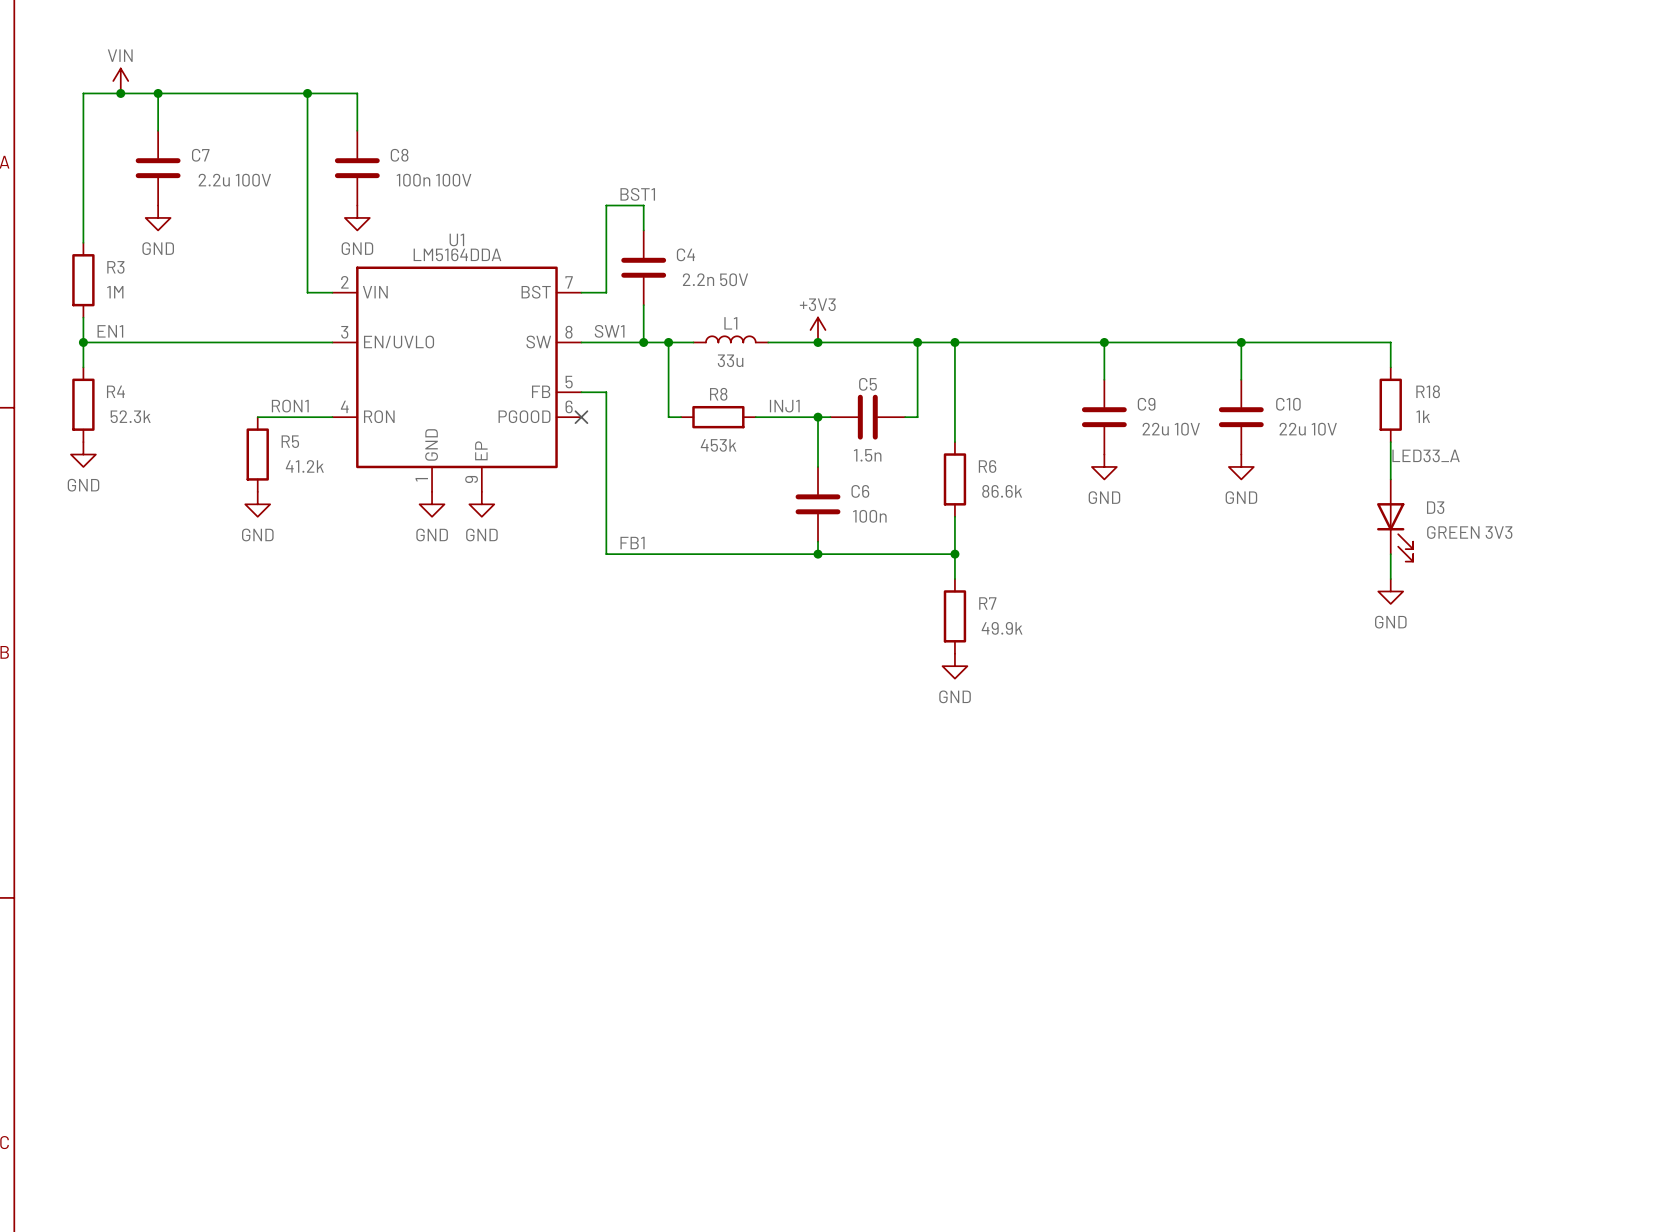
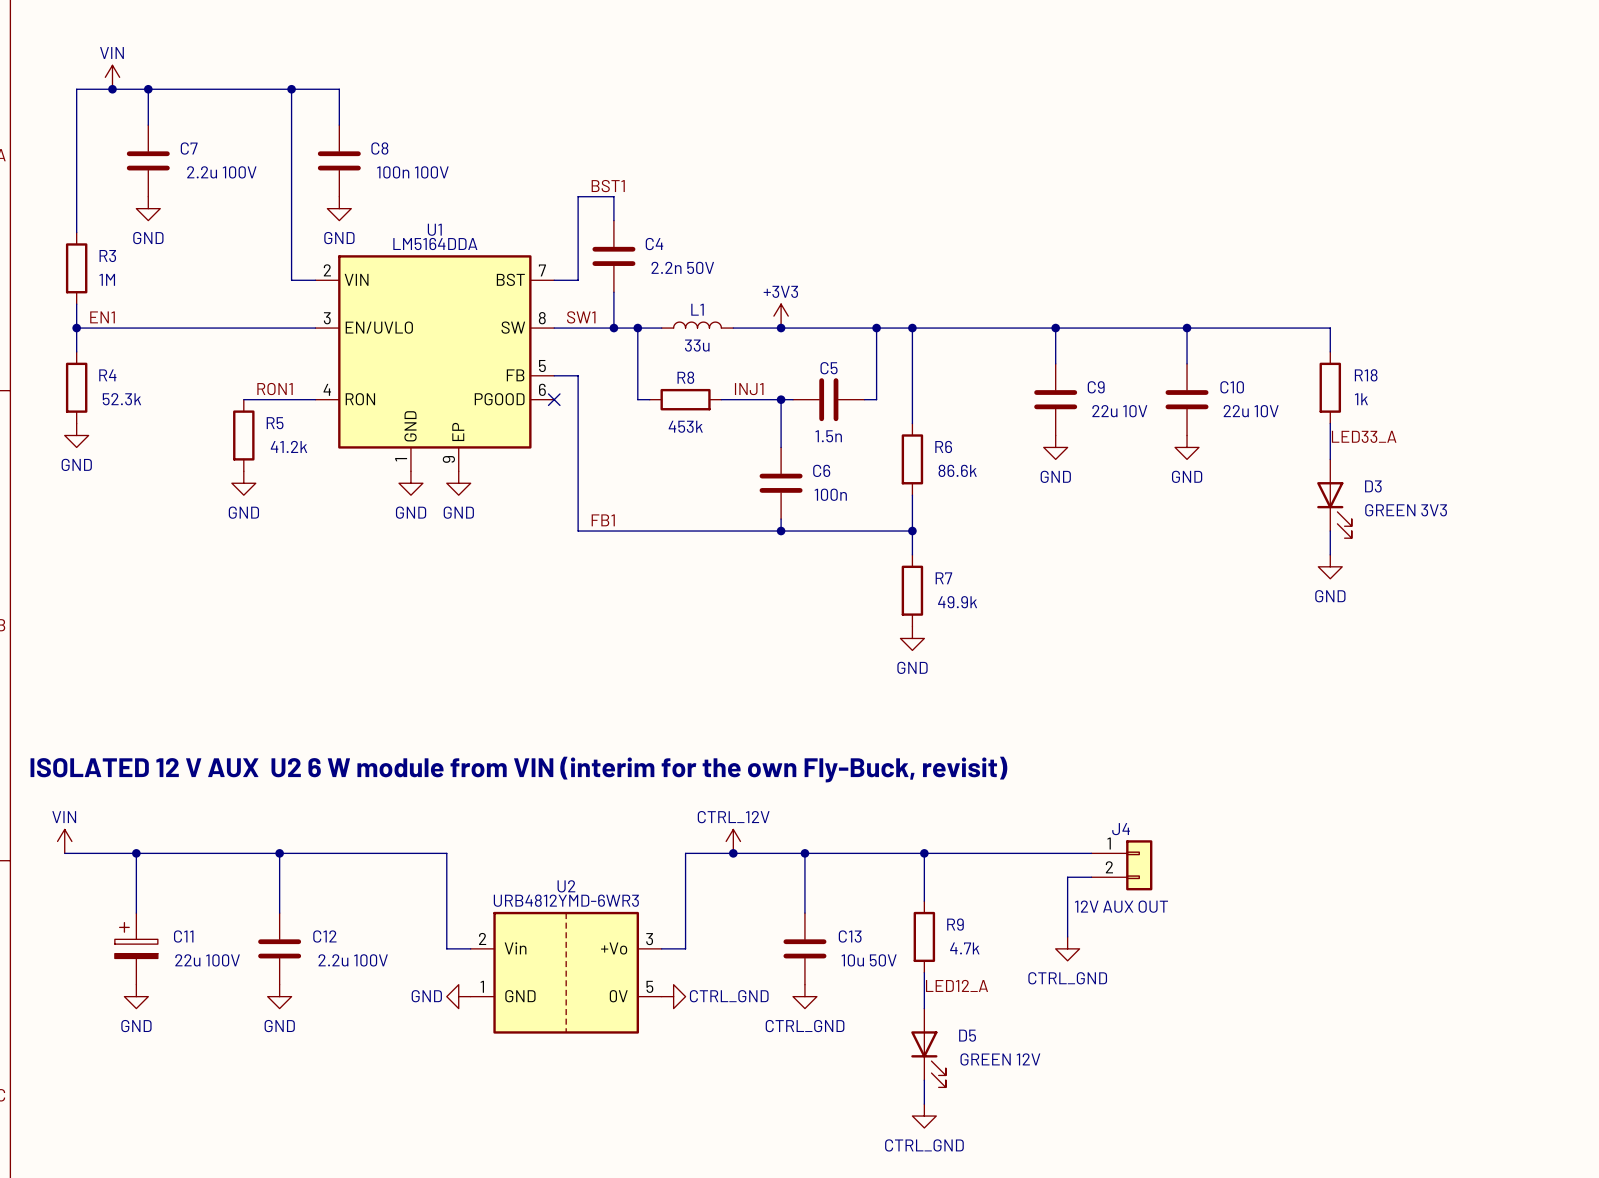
text: none -> ISOLATED 12 V AUX U2 6 W module from VIN (interim for the own Fly-Buck, revisit) (518, 769)
power symbol: none -> VIN (64, 841)
power symbol: none -> CTRL_12V (733, 841)
wire: none -> (64, 853) (446, 853) (446, 948) (470, 948)
wire: none -> (136, 853) (136, 913)
junction: none -> (136, 853)
wire: none -> (279, 853) (279, 913)
junction: none -> (279, 853)
junction: none -> (733, 853)
wire: none -> (804, 853) (804, 913)
junction: none -> (804, 853)
wire: none -> (924, 853) (924, 901)
junction: none -> (924, 853)
wire: none -> (1091, 853) (685, 853) (685, 948) (661, 948)
J4: none -> 12V AUX OUT (1121, 865)
wire: none -> (1091, 877) (1067, 877) (1067, 936)
R9: none -> 4.7k (924, 936)
C11: none -> 22u 100V (136, 948)
C12: none -> 2.2u 100V (279, 948)
C13: none -> 10u 50V (804, 948)
power symbol: none -> CTRL_GND (1067, 948)
U2: none -> URB4812YMD-6WR3 (566, 972)
wire: none -> (924, 972) (924, 1008)
label: none -> LED12_A (956, 985)
power symbol: none -> GND (136, 996)
power symbol: none -> GND (279, 996)
power symbol: none -> GND (458, 996)
power symbol: none -> CTRL_GND (673, 996)
power symbol: none -> CTRL_GND (804, 996)
D5: none -> GREEN 12V (928, 1047)
wire: none -> (924, 1080) (924, 1104)
power symbol: none -> CTRL_GND (924, 1116)

